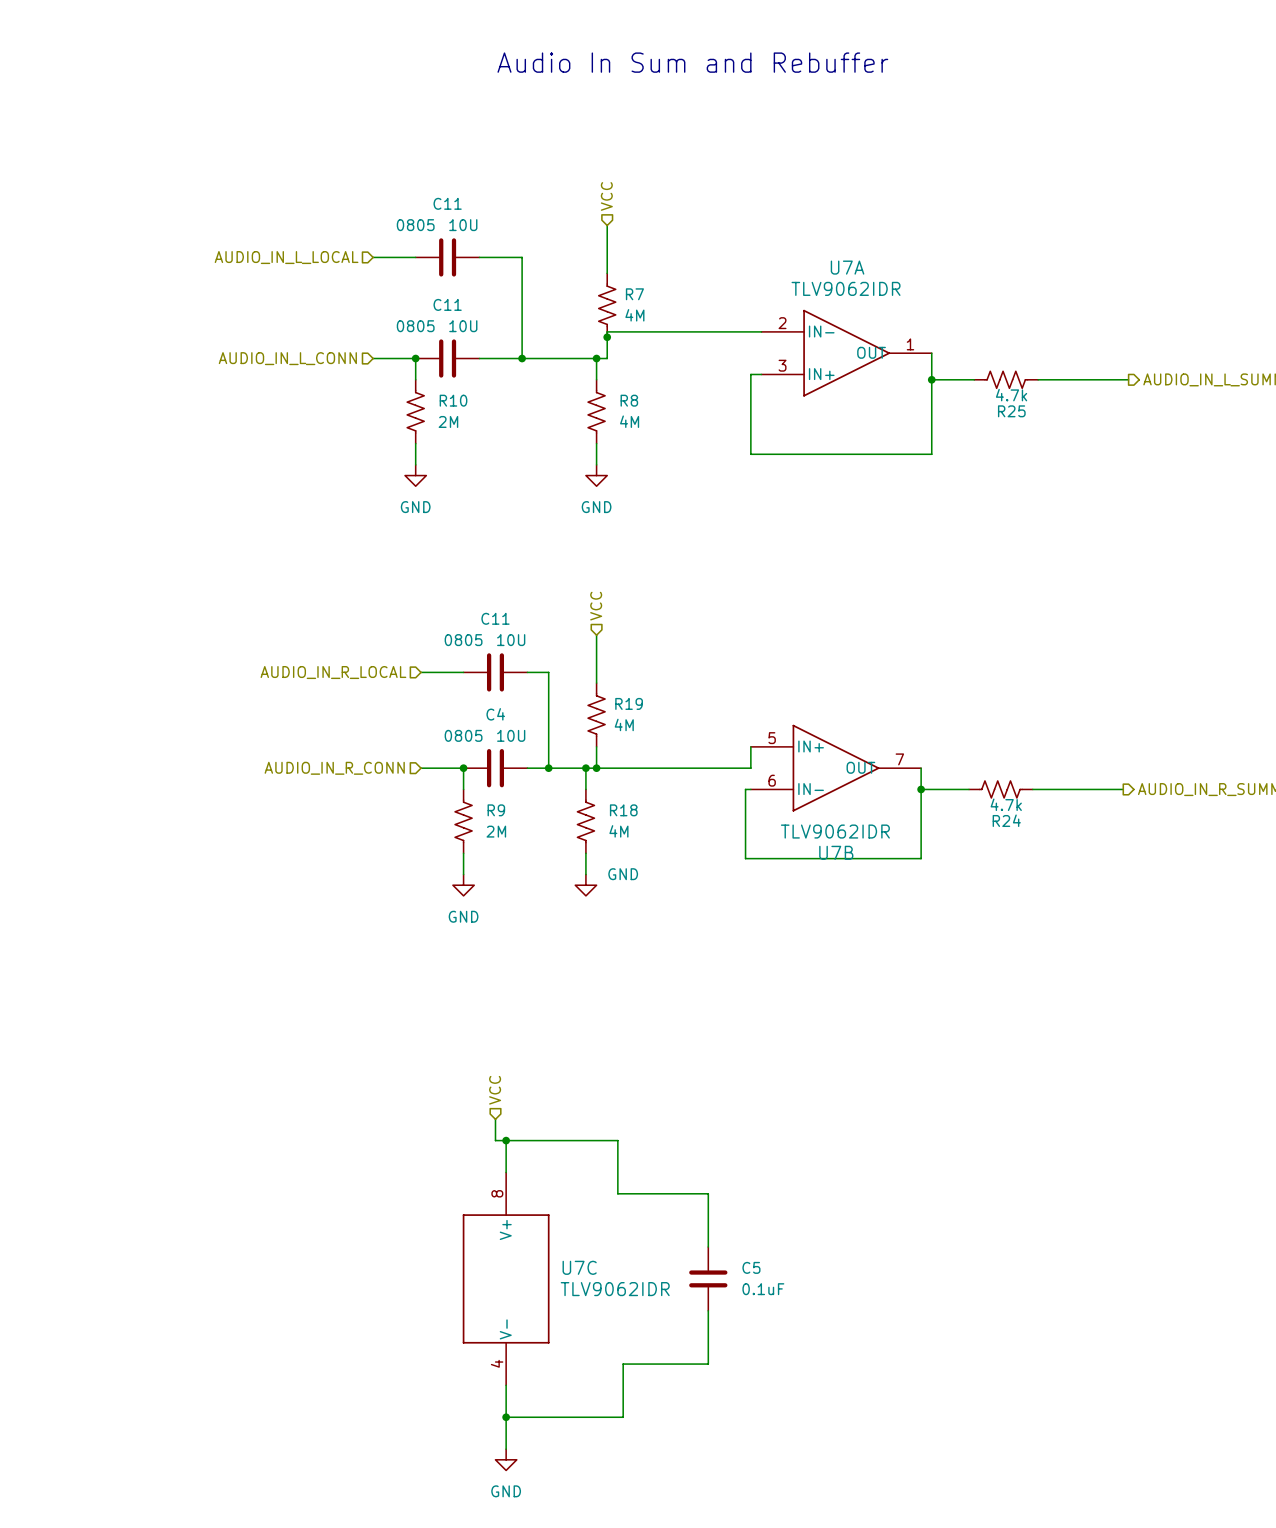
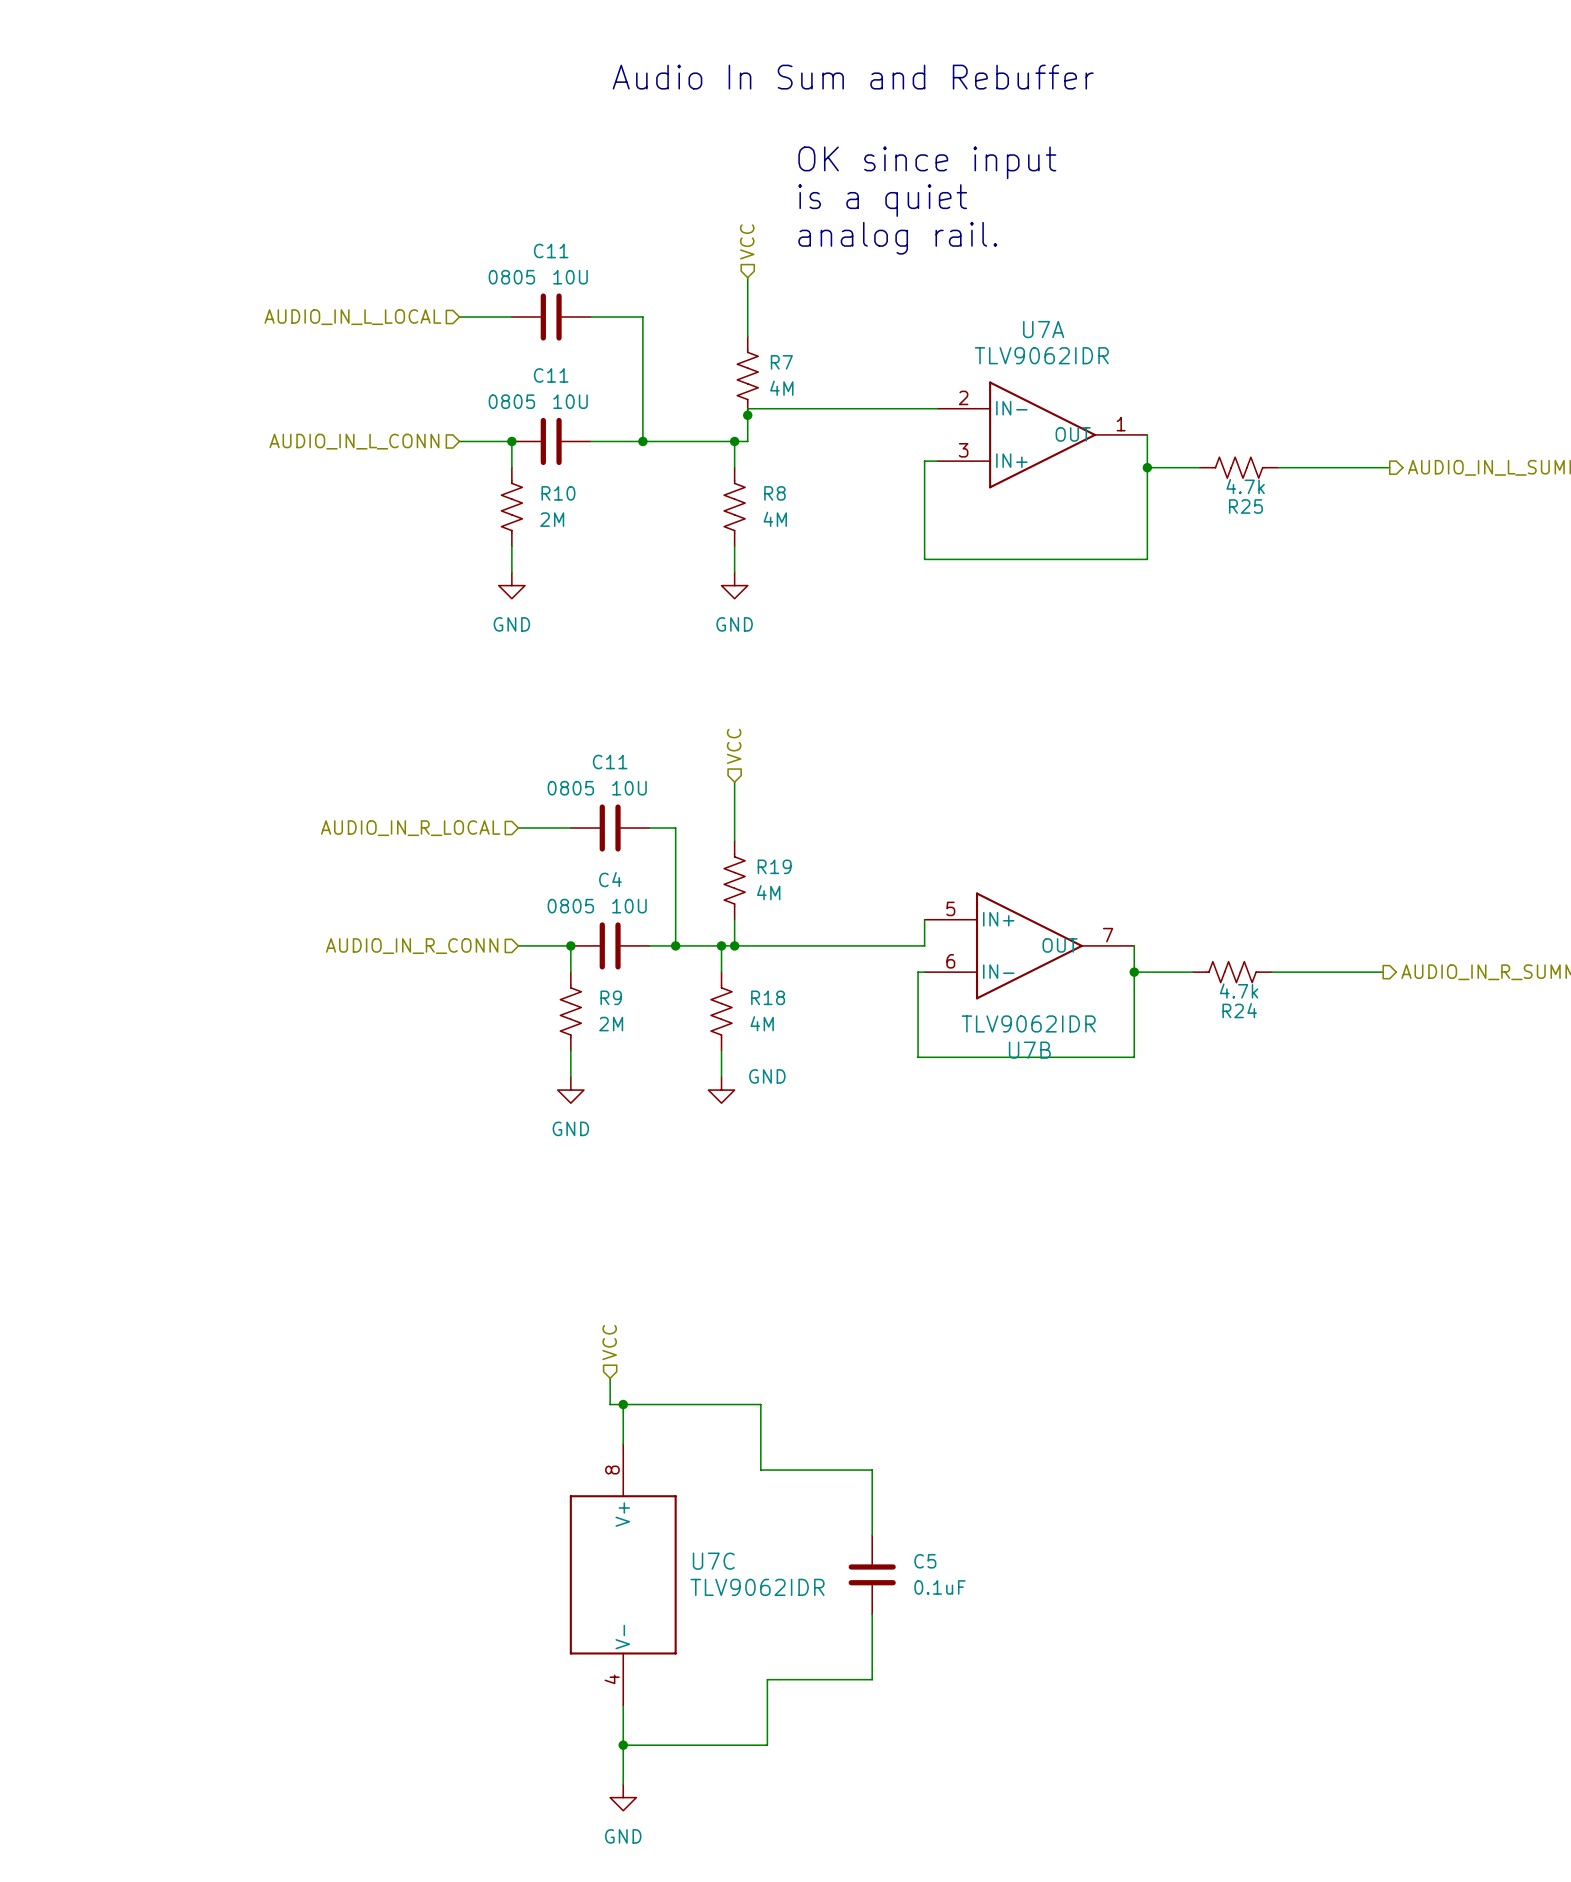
text: none -> OK since input (927, 162)
text: none -> is a quiet (882, 200)
text: none -> analog rail. (897, 238)

